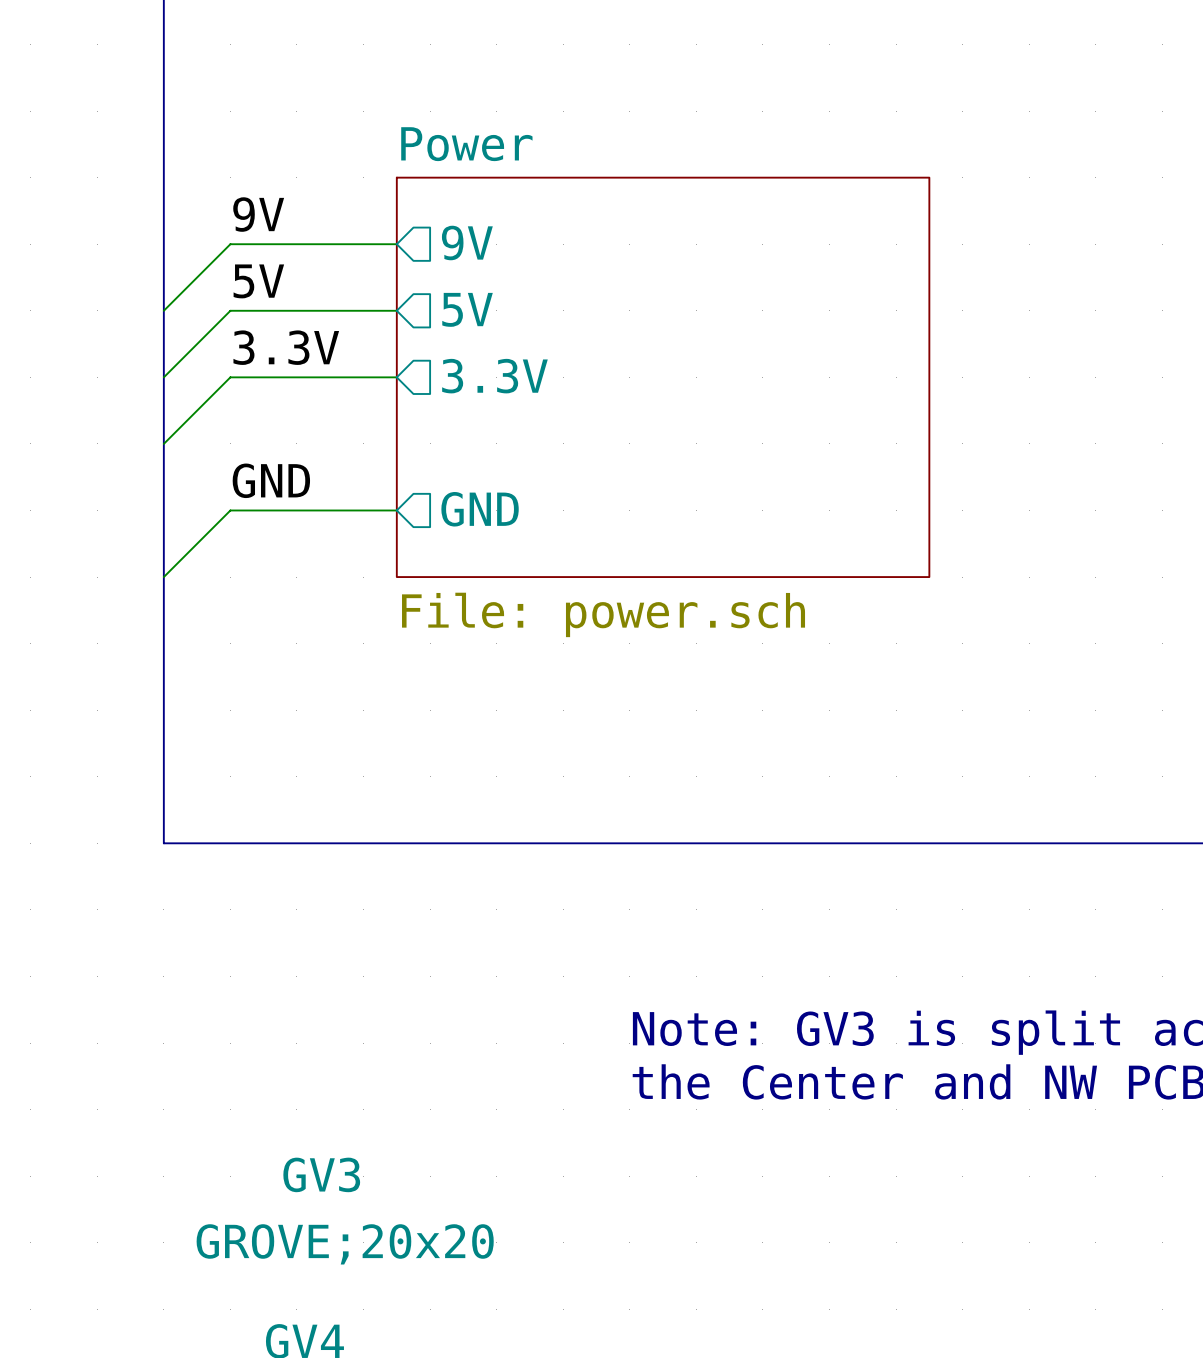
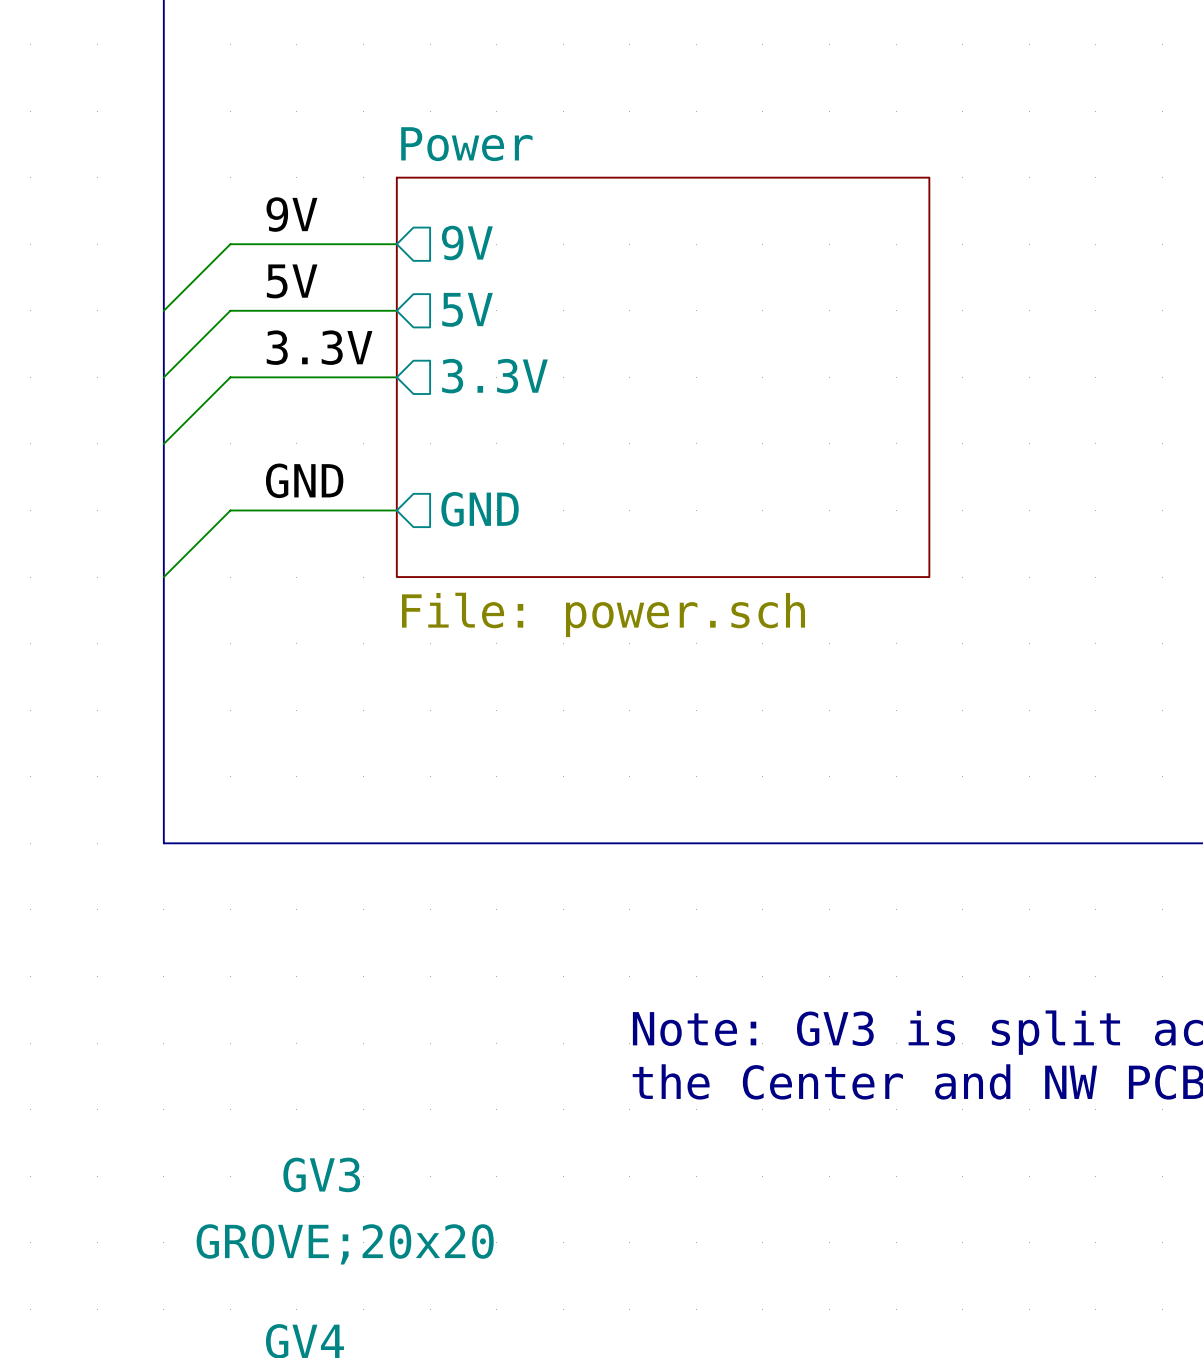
label position: 9V (258, 214) -> 9V (291, 214)
label position: 5V (258, 281) -> 5V (292, 281)
label position: 3.3V (286, 347) -> 3.3V (319, 347)
label position: GND (271, 480) -> GND (304, 480)

